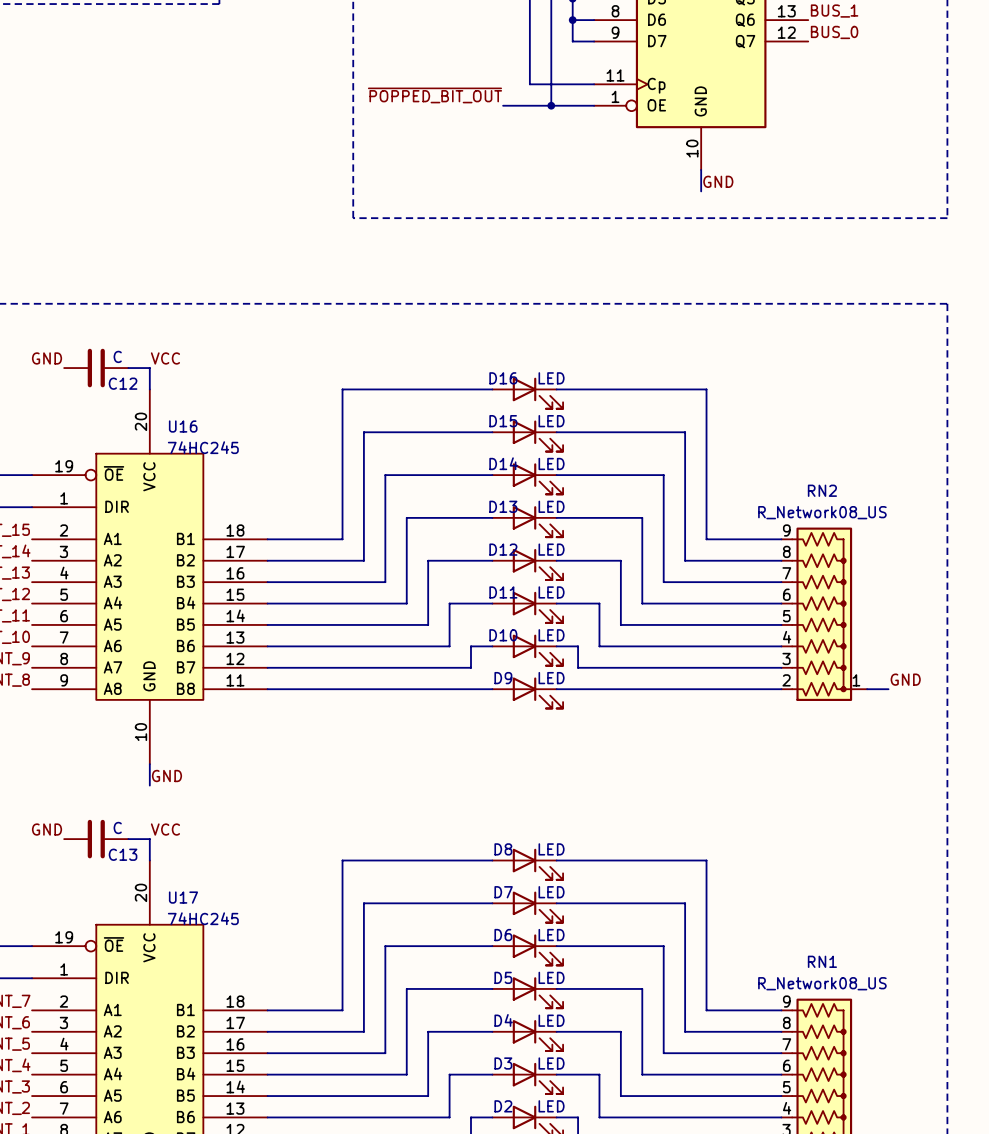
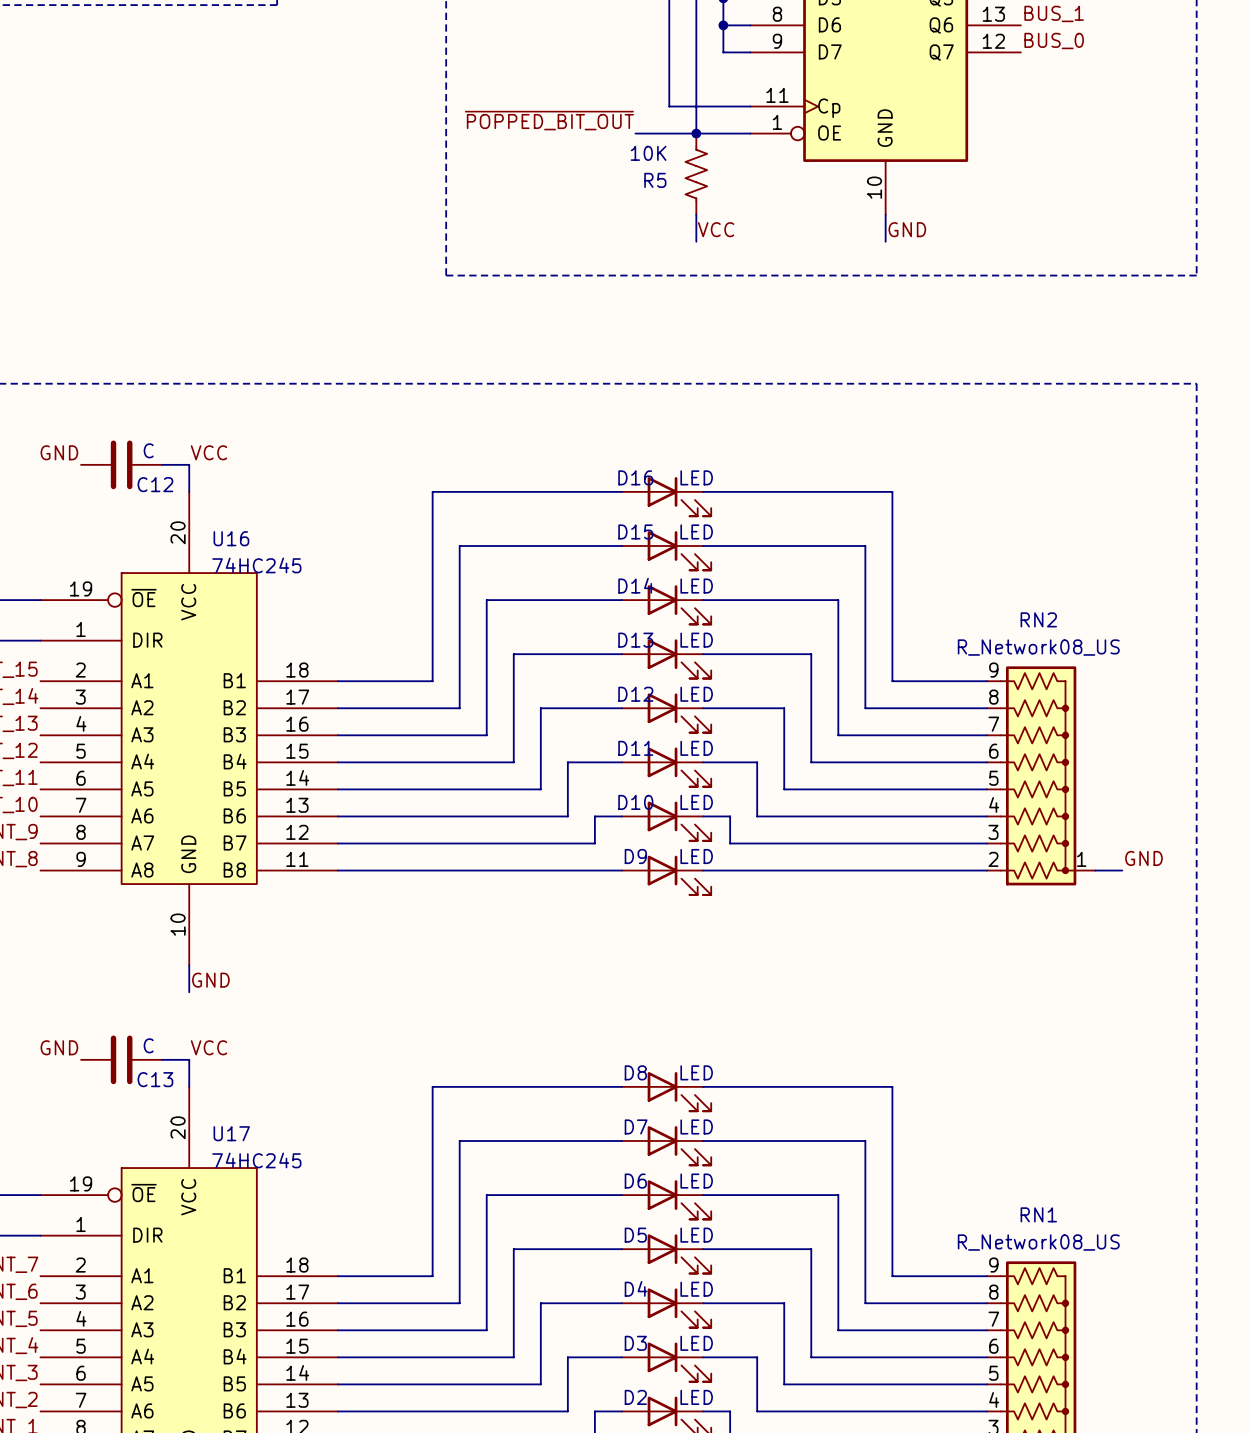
R5: none -> 10K (696, 174)
wire: none -> (696, 214) (696, 241)
label: none -> VCC (716, 229)

